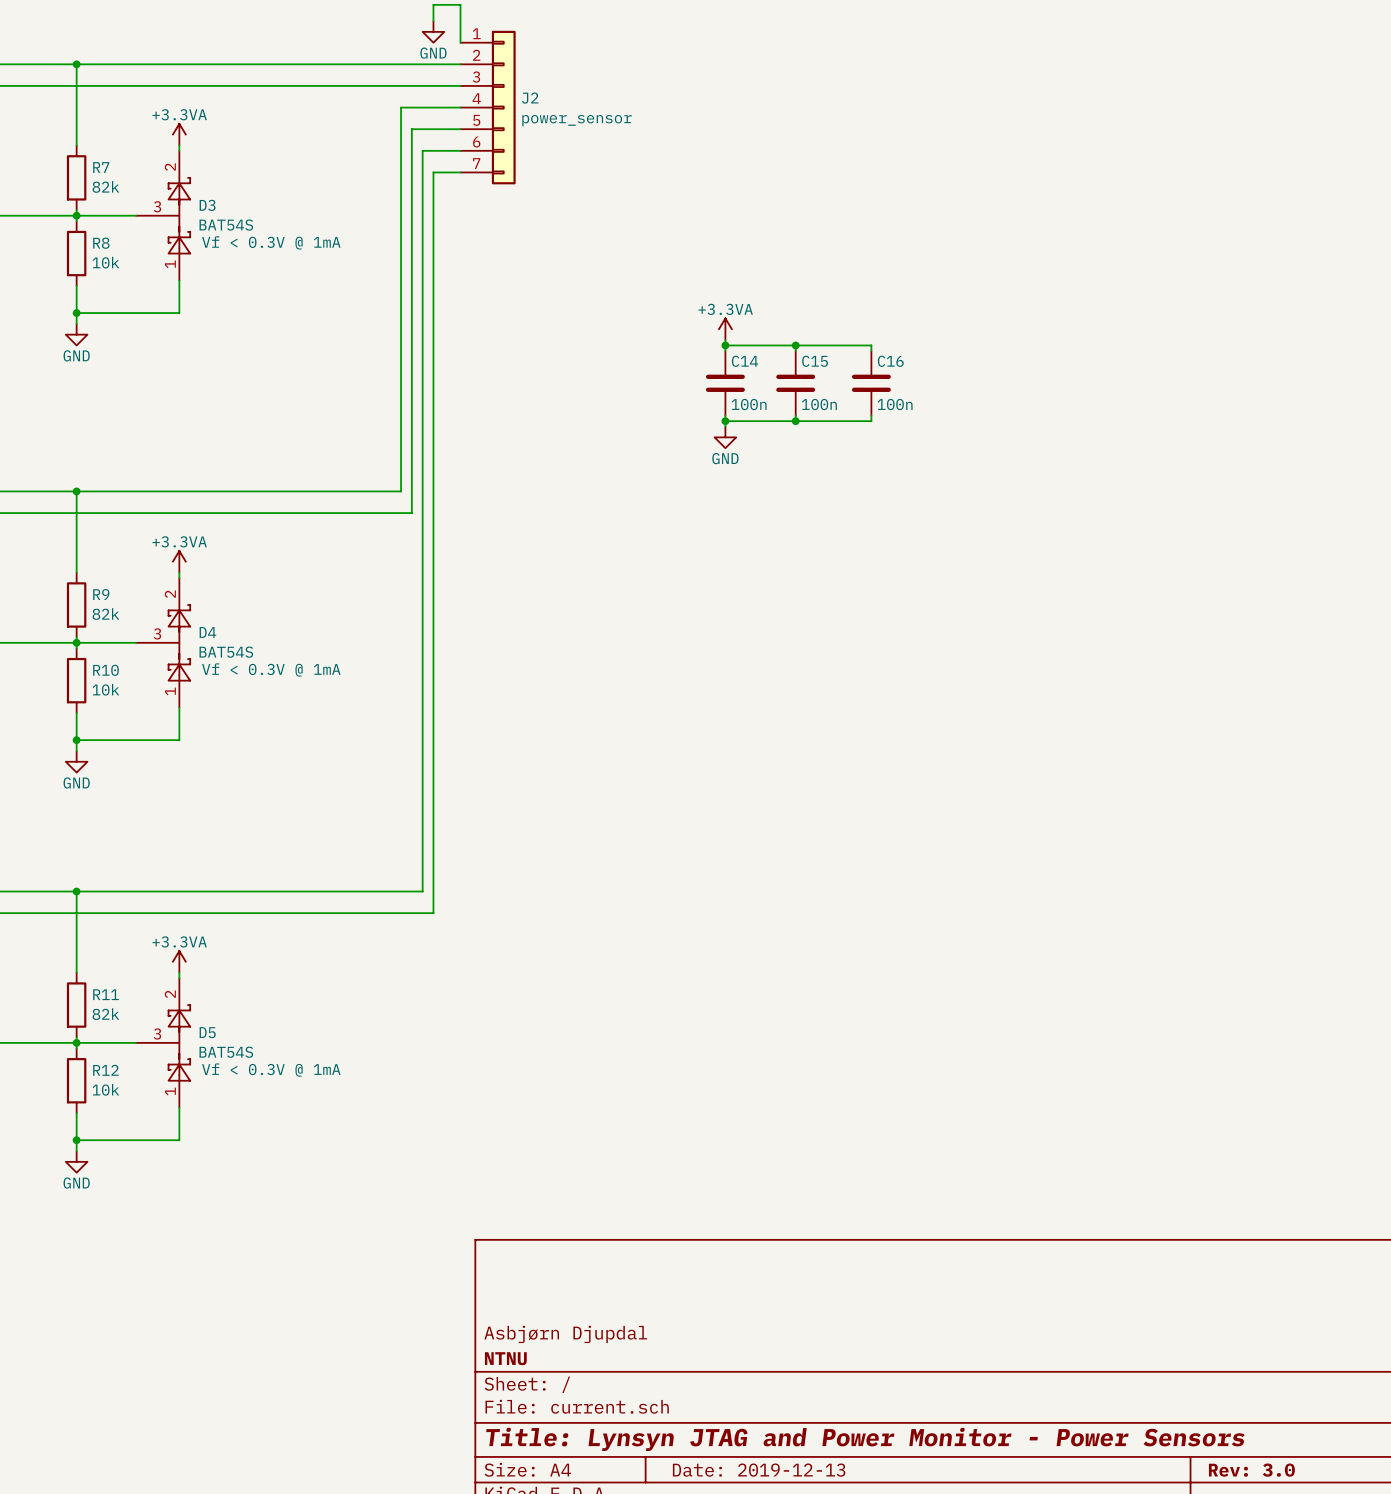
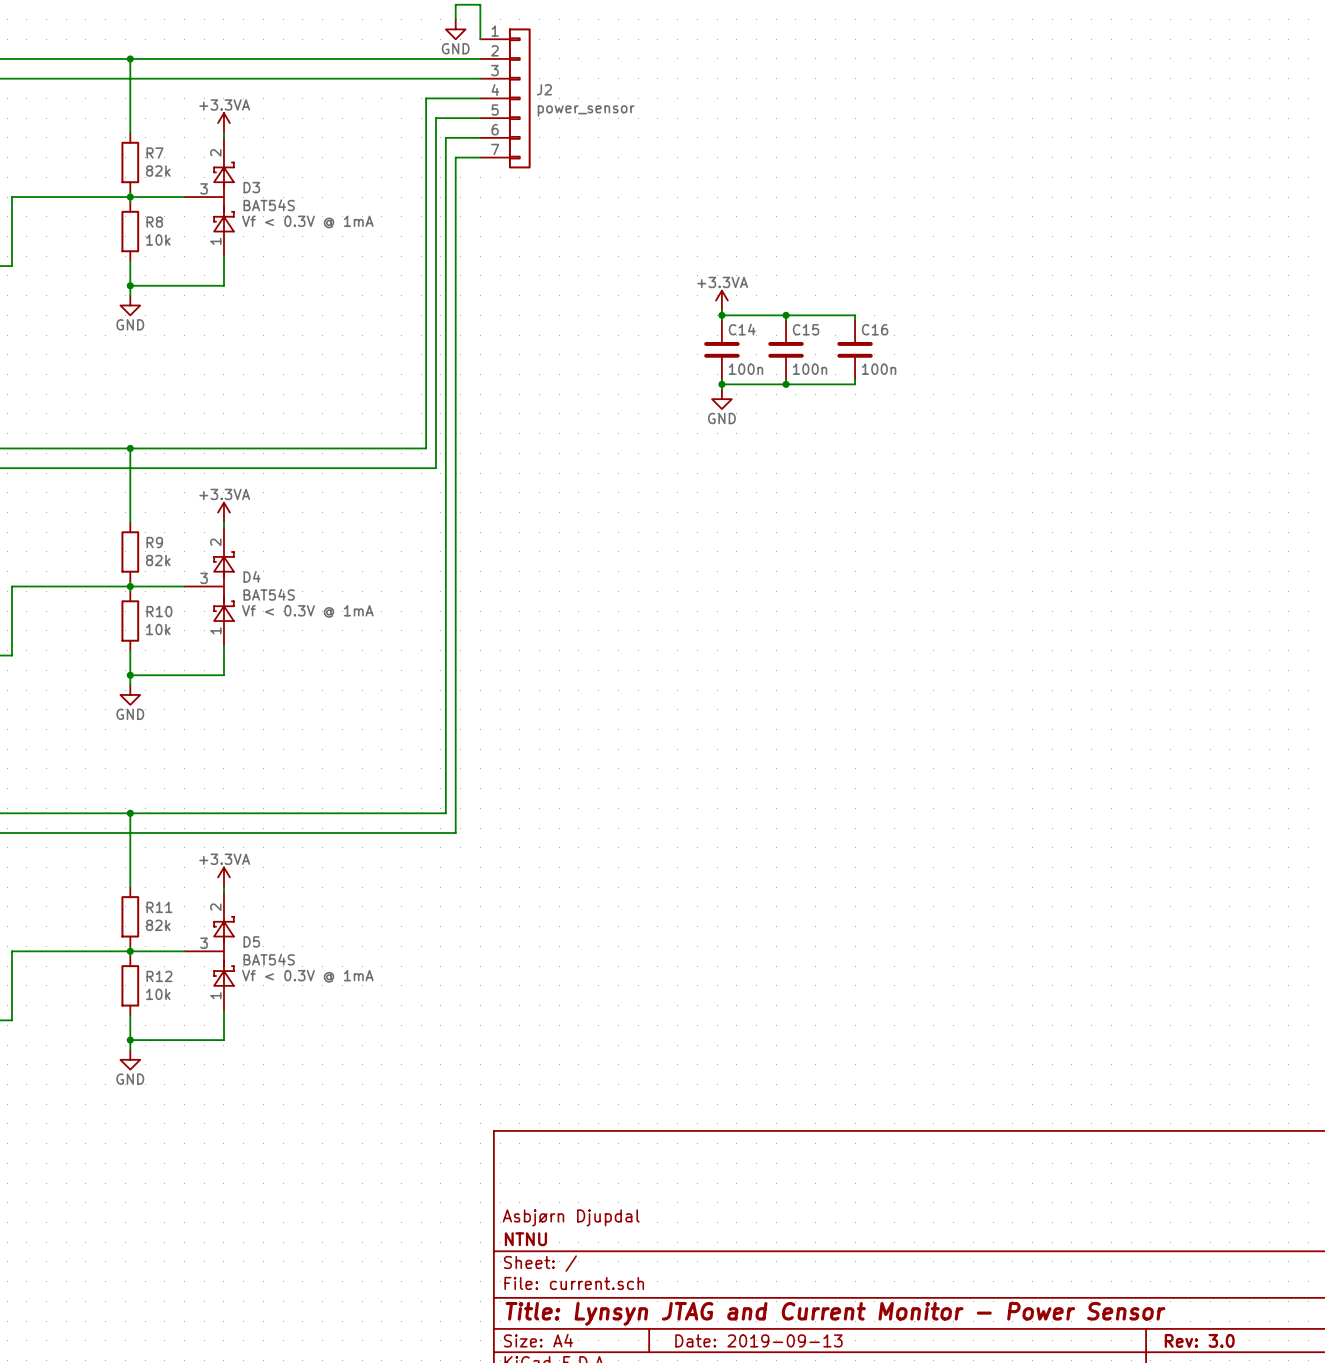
title block: Title: Lynsyn JTAG and Power Monitor - Power Sensors (865, 1439) -> Title: Lynsyn JTAG and Current Monitor - Power Sensor (835, 1313)
title block: Date: 2019-12-13 (759, 1470) -> Date: 2019-09-13 (758, 1340)

